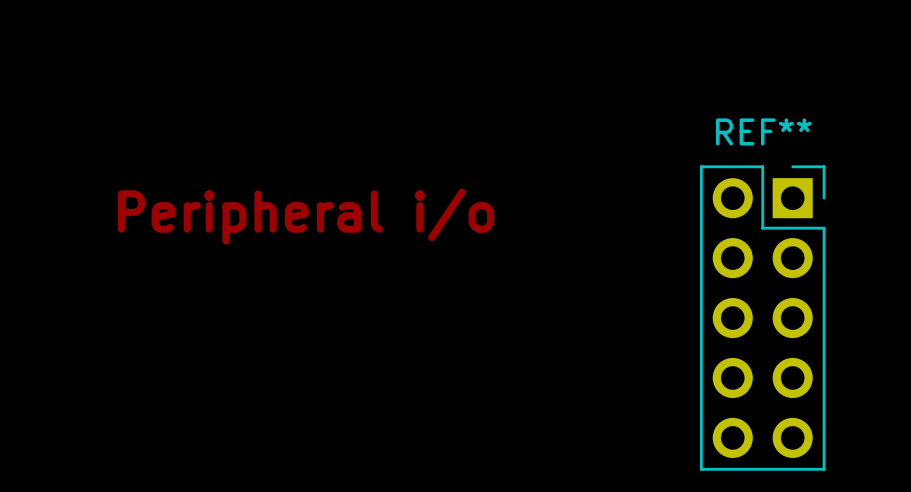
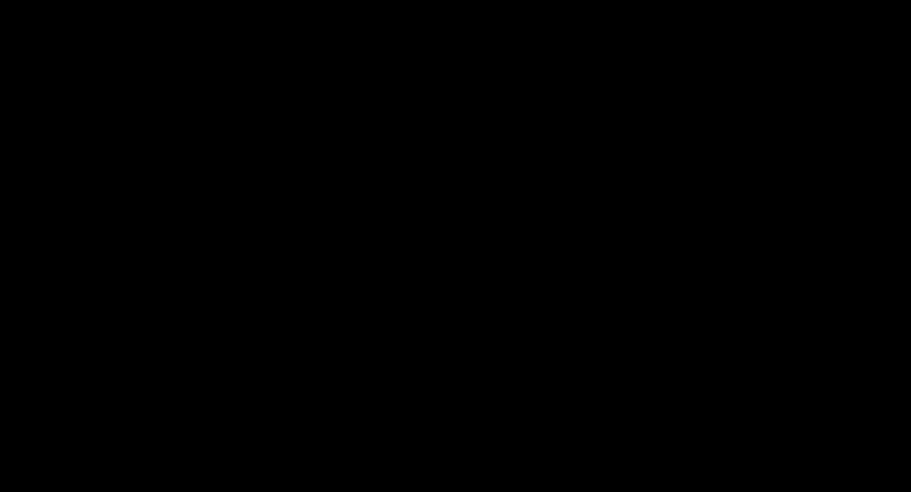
text: Peripheral i/o (306, 216) -> none
REF**: (762, 318) -> none

